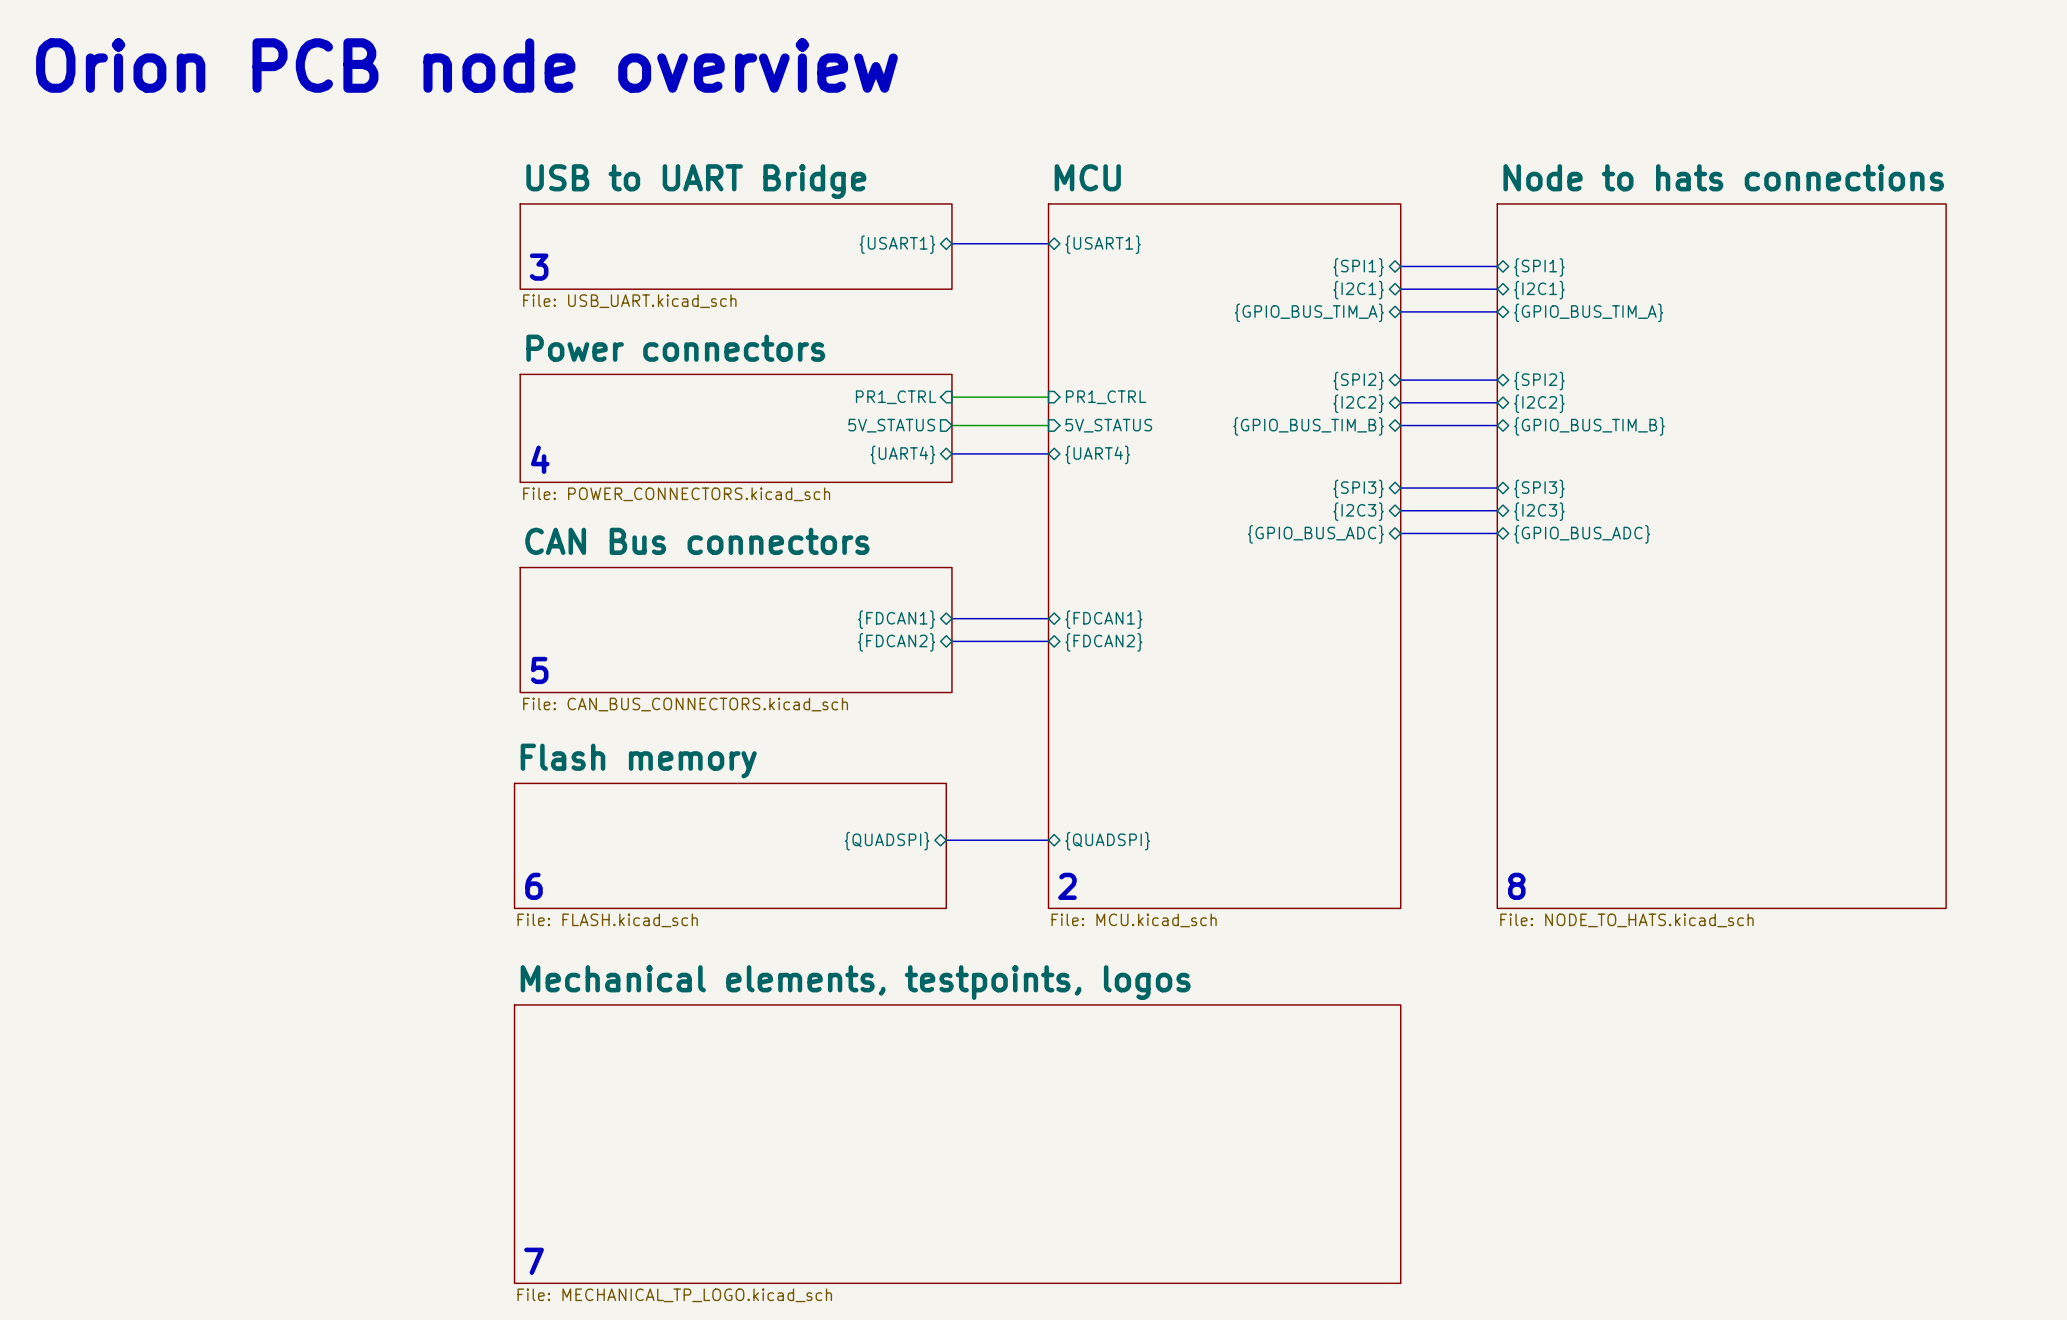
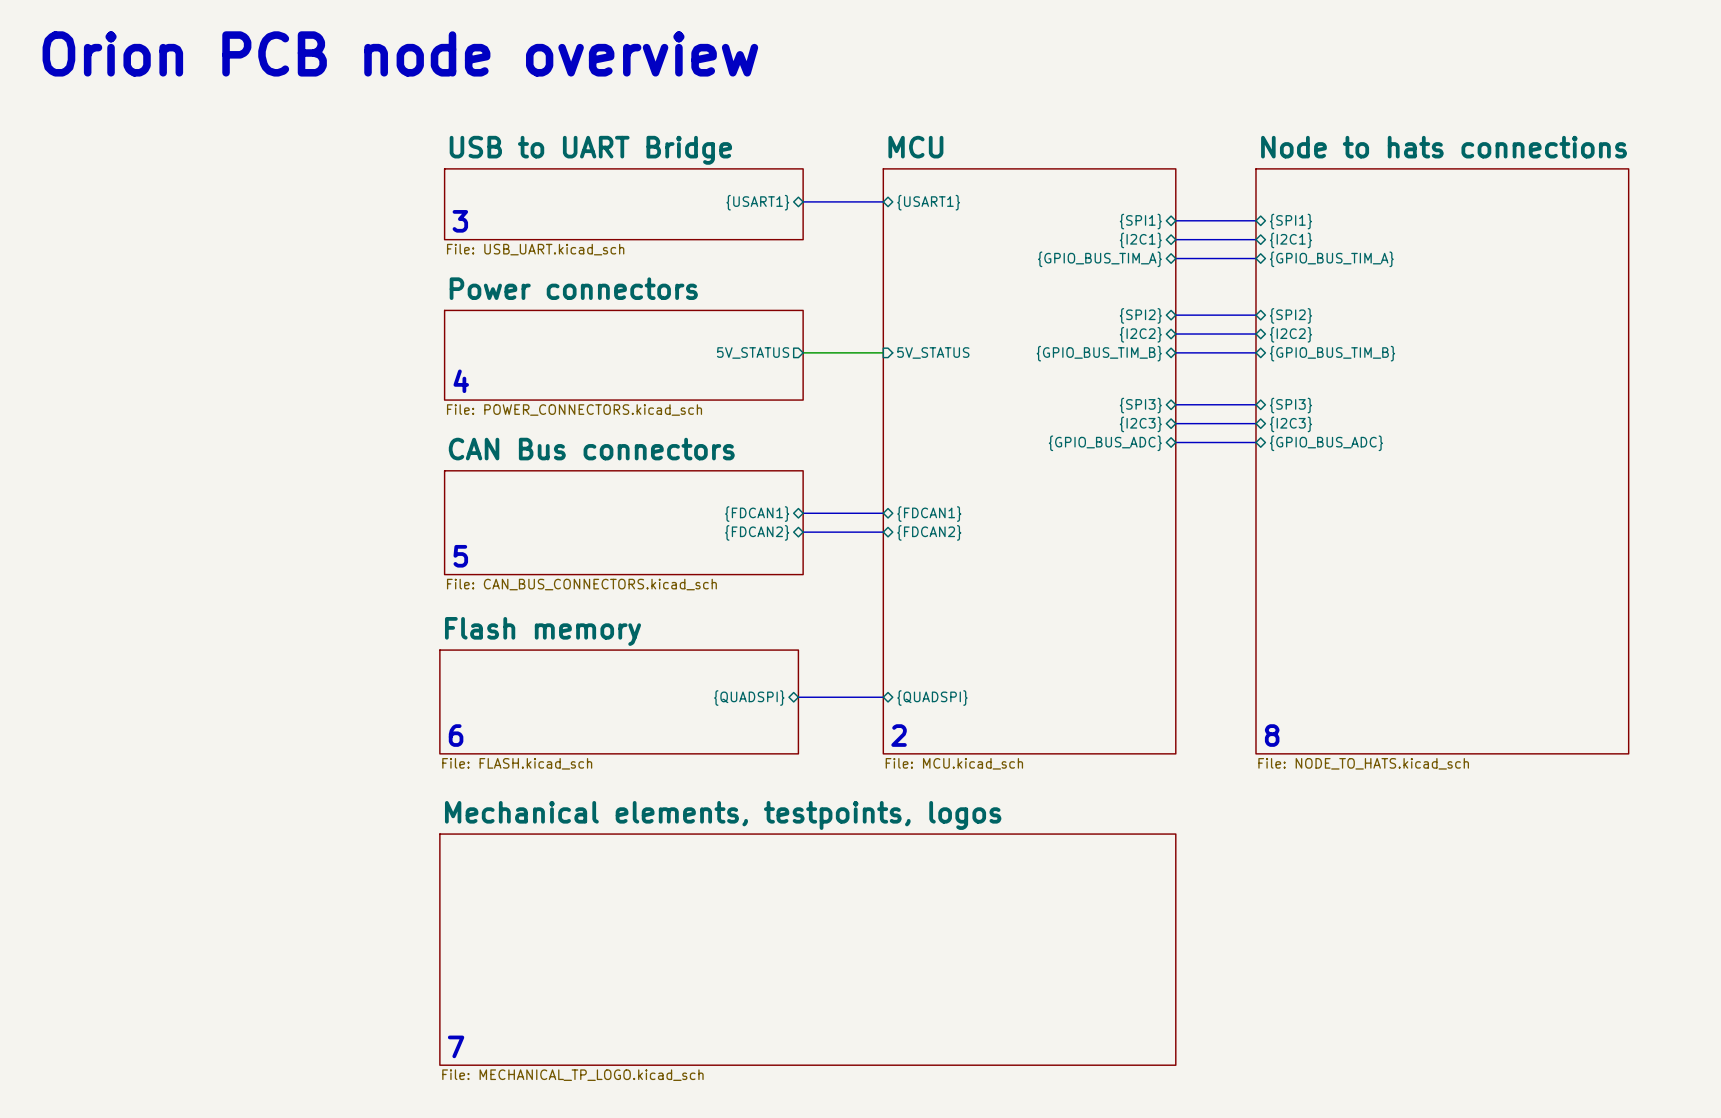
sheet pin: PR1_CTRL (896, 397) -> none
wire: (951, 397) (1048, 397) -> none
sheet pin: PR1_CTRL (1106, 397) -> none
bus: (951, 453) (1048, 453) -> none
sheet pin: {UART4} (902, 454) -> none
sheet pin: {UART4} (1097, 454) -> none

